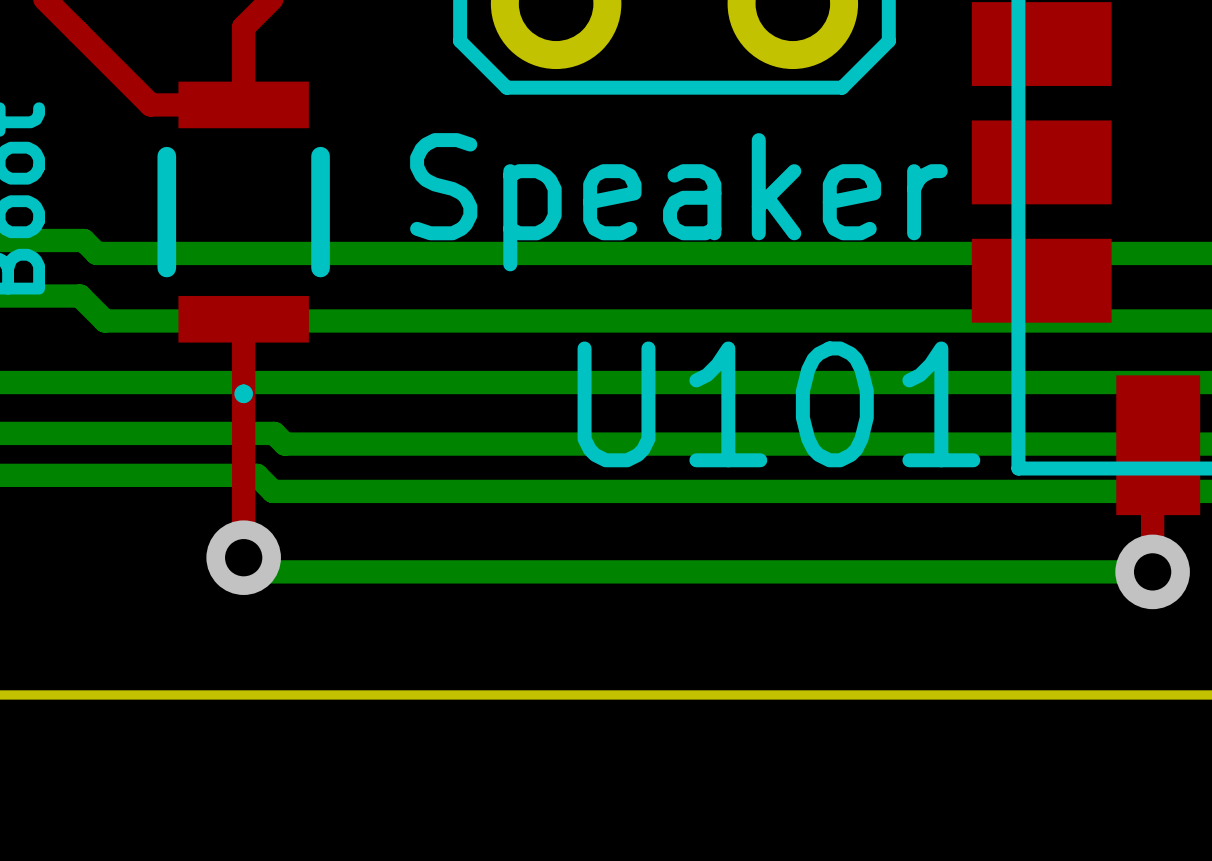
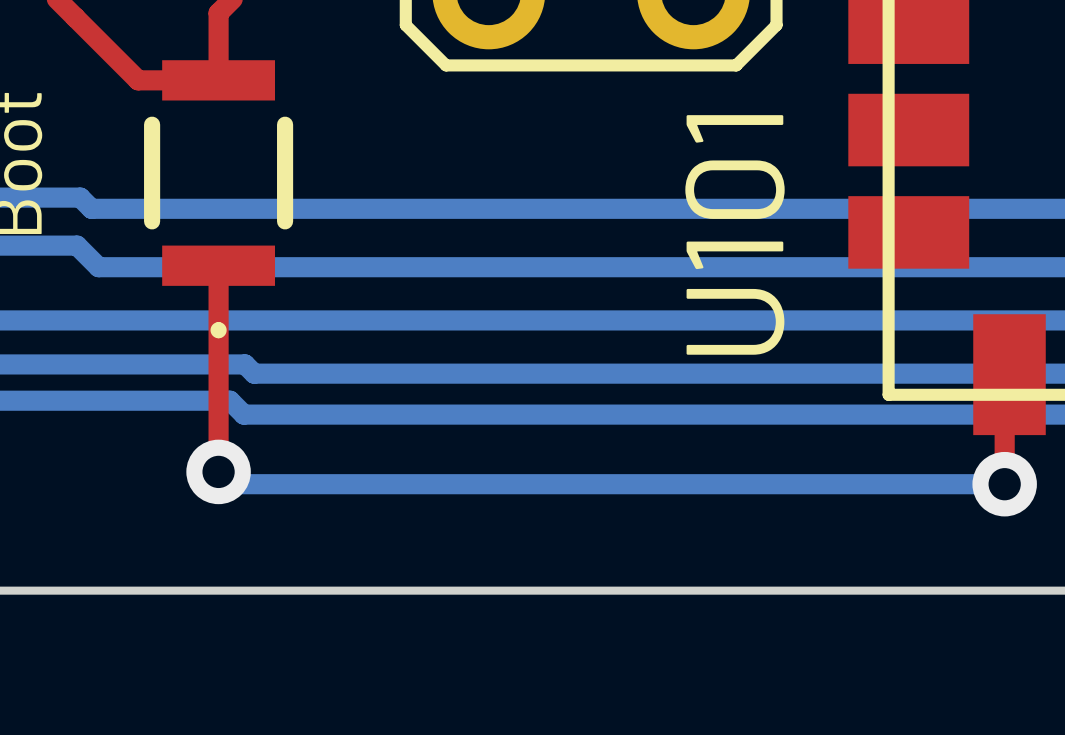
part value: Speaker (678, 202) -> none
U101 name rotation: 0° (778, 404) -> 90° counterclockwise (735, 234)

